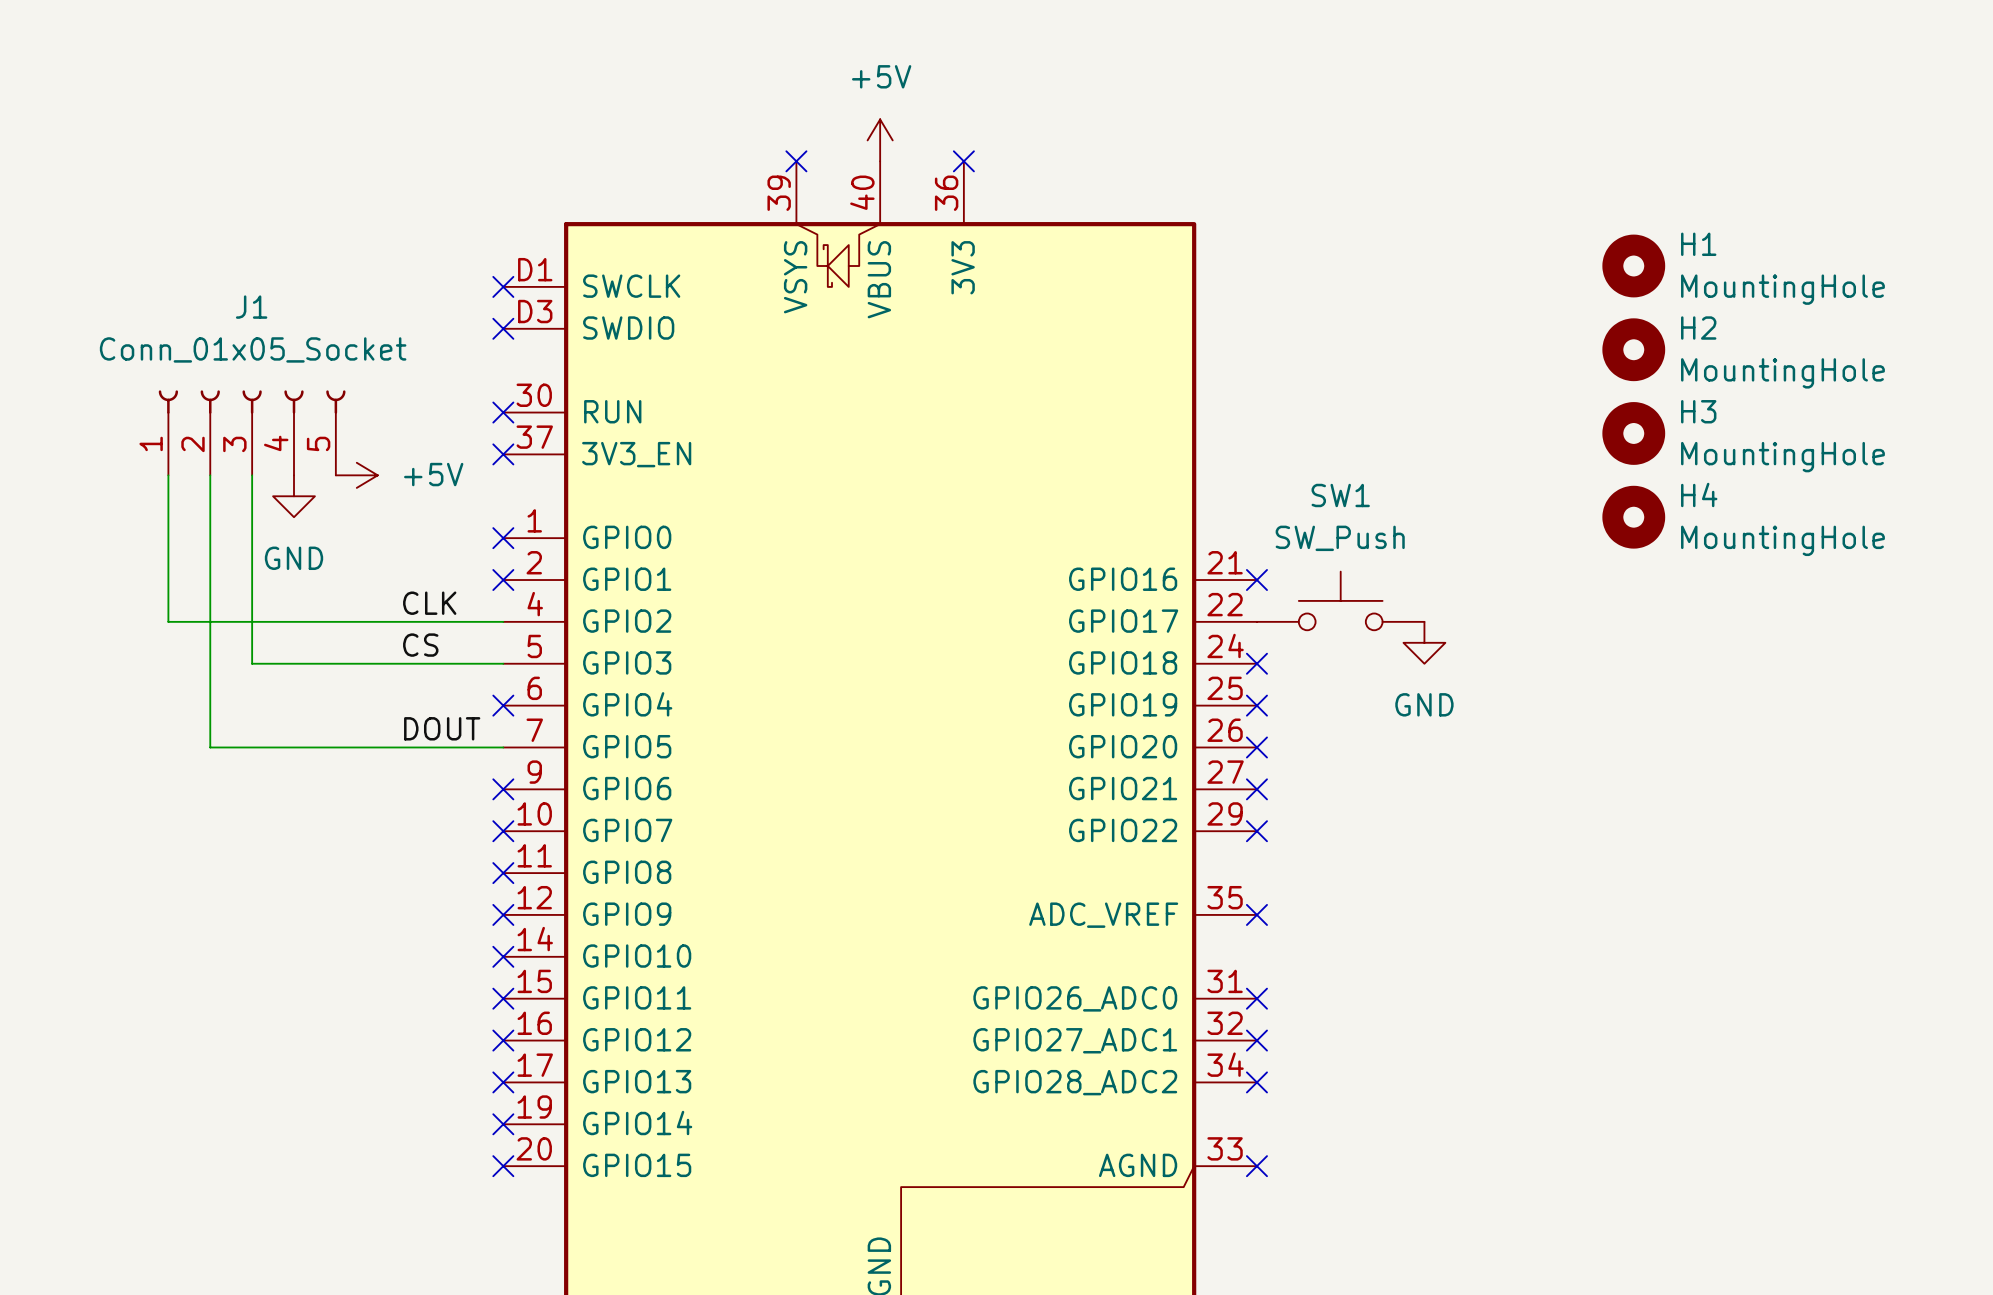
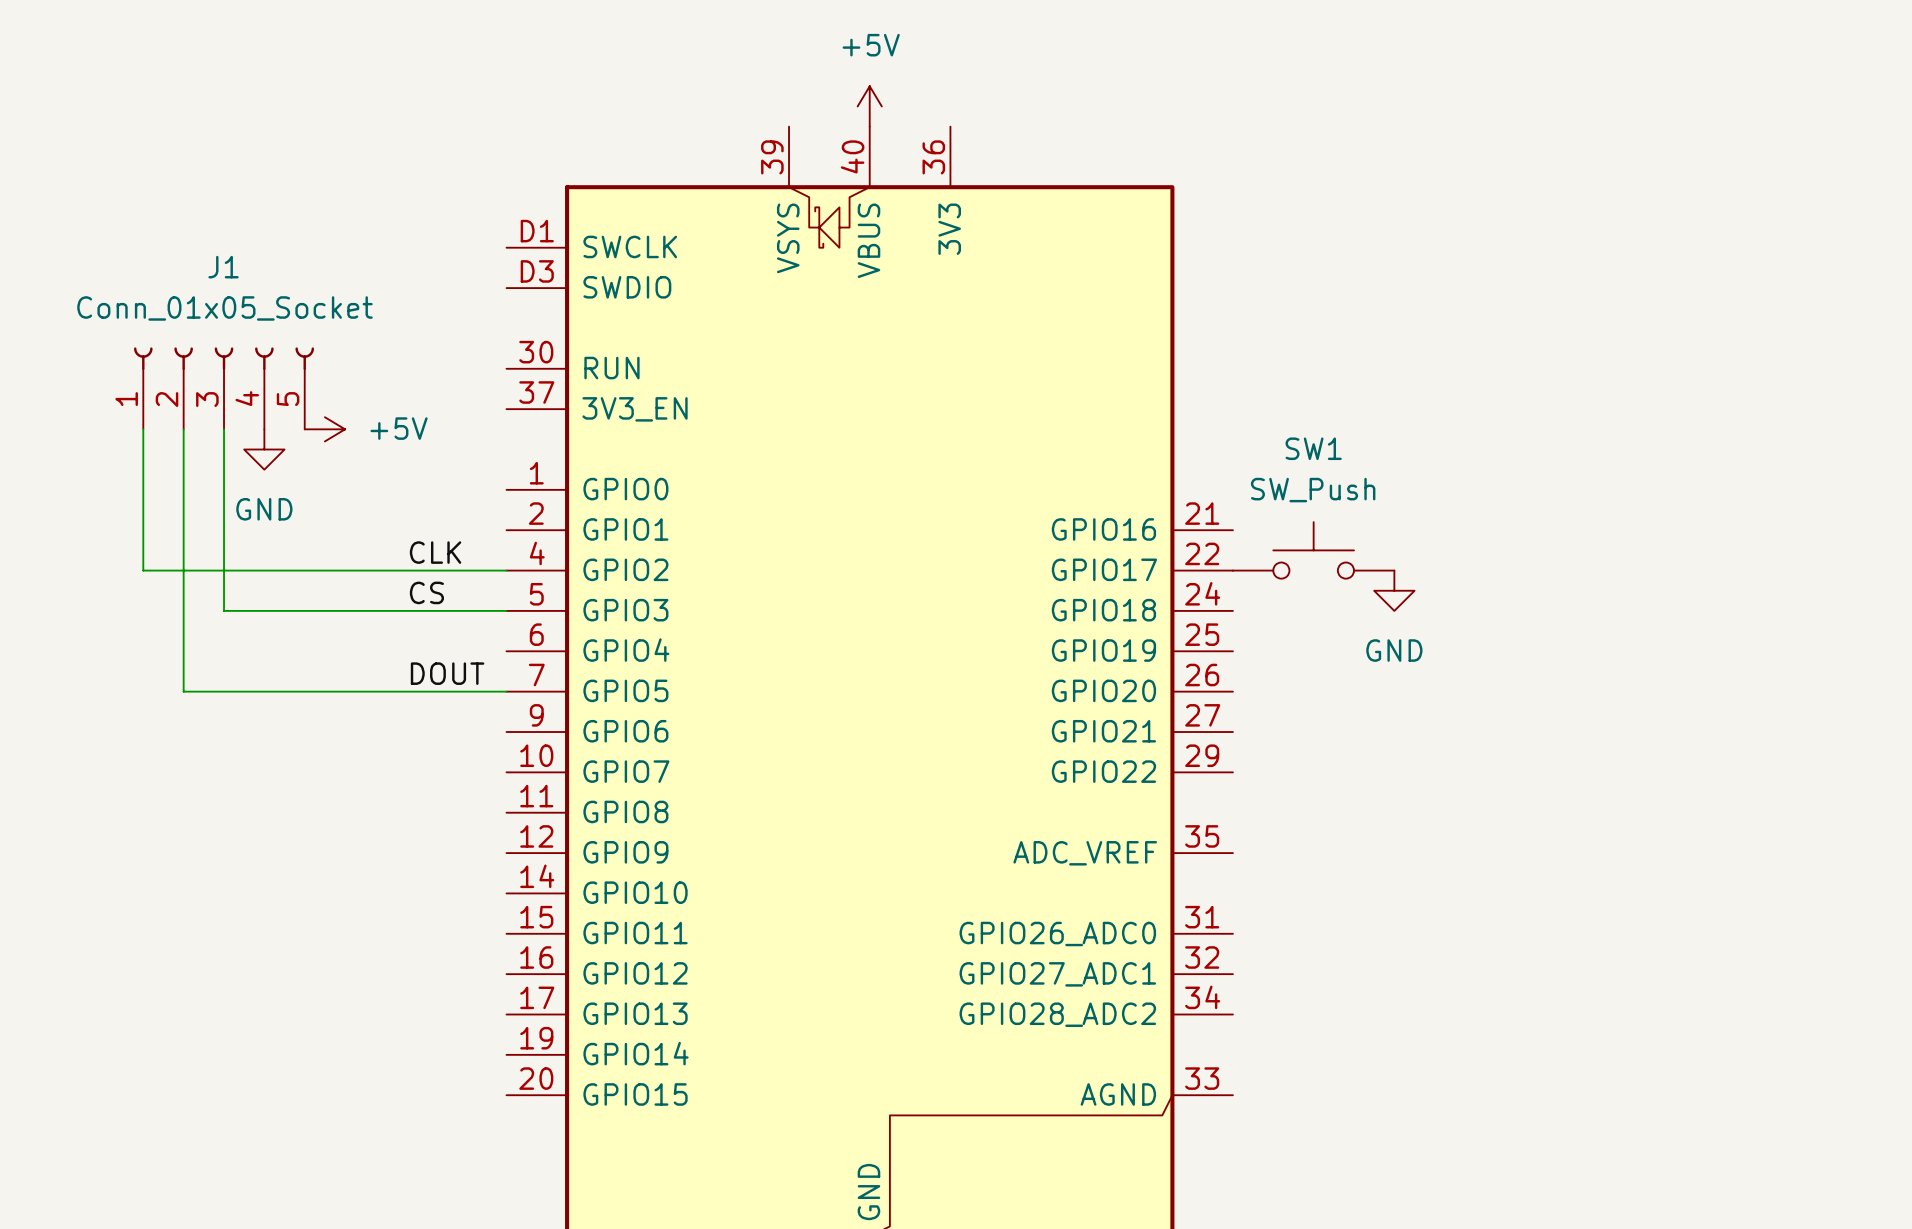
no-connect mark: (796, 161) -> none
no-connect mark: (963, 161) -> none
H1: MountingHole (1633, 266) -> none
no-connect mark: (503, 286) -> none
no-connect mark: (503, 328) -> none
H2: MountingHole (1633, 349) -> none
no-connect mark: (503, 412) -> none
J1 position: (252, 432) -> (224, 388)
H3: MountingHole (1633, 433) -> none
no-connect mark: (503, 454) -> none
wire: none -> (143, 429) (143, 570) (183, 570) (183, 691) (224, 691)
wire: (252, 475) (252, 663) -> none
power symbol position: +5V (356, 475) -> +5V (324, 429)
power symbol position: GND (294, 496) -> GND (264, 449)
H4: MountingHole (1633, 517) -> none
no-connect mark: (503, 538) -> none
no-connect mark: (503, 580) -> none
no-connect mark: (1256, 580) -> none
wire: (210, 663) (210, 747) -> (224, 610) (264, 610)
no-connect mark: (1256, 663) -> none
no-connect mark: (503, 705) -> none
no-connect mark: (1256, 705) -> none
no-connect mark: (1256, 747) -> none
no-connect mark: (503, 789) -> none
no-connect mark: (1256, 789) -> none
no-connect mark: (503, 831) -> none
no-connect mark: (1256, 831) -> none
no-connect mark: (503, 873) -> none
no-connect mark: (503, 914) -> none
no-connect mark: (1256, 914) -> none
no-connect mark: (503, 956) -> none
no-connect mark: (503, 998) -> none
no-connect mark: (1256, 998) -> none
no-connect mark: (503, 1040) -> none
no-connect mark: (1256, 1040) -> none
no-connect mark: (503, 1082) -> none
no-connect mark: (1256, 1082) -> none
no-connect mark: (503, 1124) -> none
no-connect mark: (503, 1166) -> none
no-connect mark: (1256, 1166) -> none

